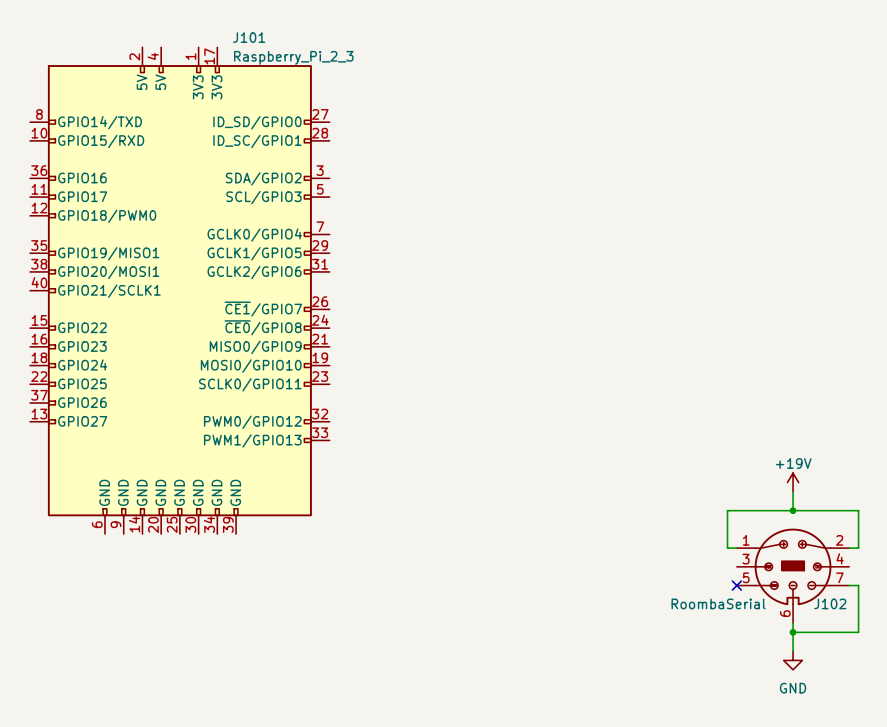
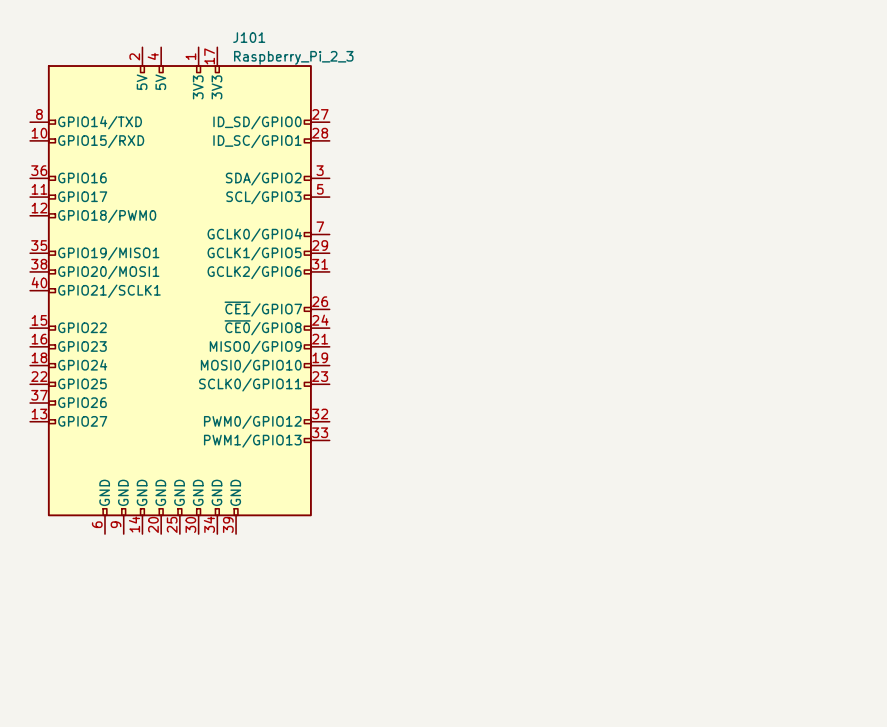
power symbol: +19V (793, 482) -> none
wire: (793, 491) (793, 510) -> none
junction: (793, 510) -> none
wire: (736, 548) (727, 548) (727, 510) (858, 510) (858, 548) (849, 548) -> none
J102: RoombaSerial (793, 575) -> none
no-connect mark: (736, 585) -> none
wire: (849, 585) (858, 585) (858, 632) (793, 632) -> none
wire: (793, 622) (793, 651) -> none
junction: (793, 632) -> none
power symbol: GND (793, 660) -> none

